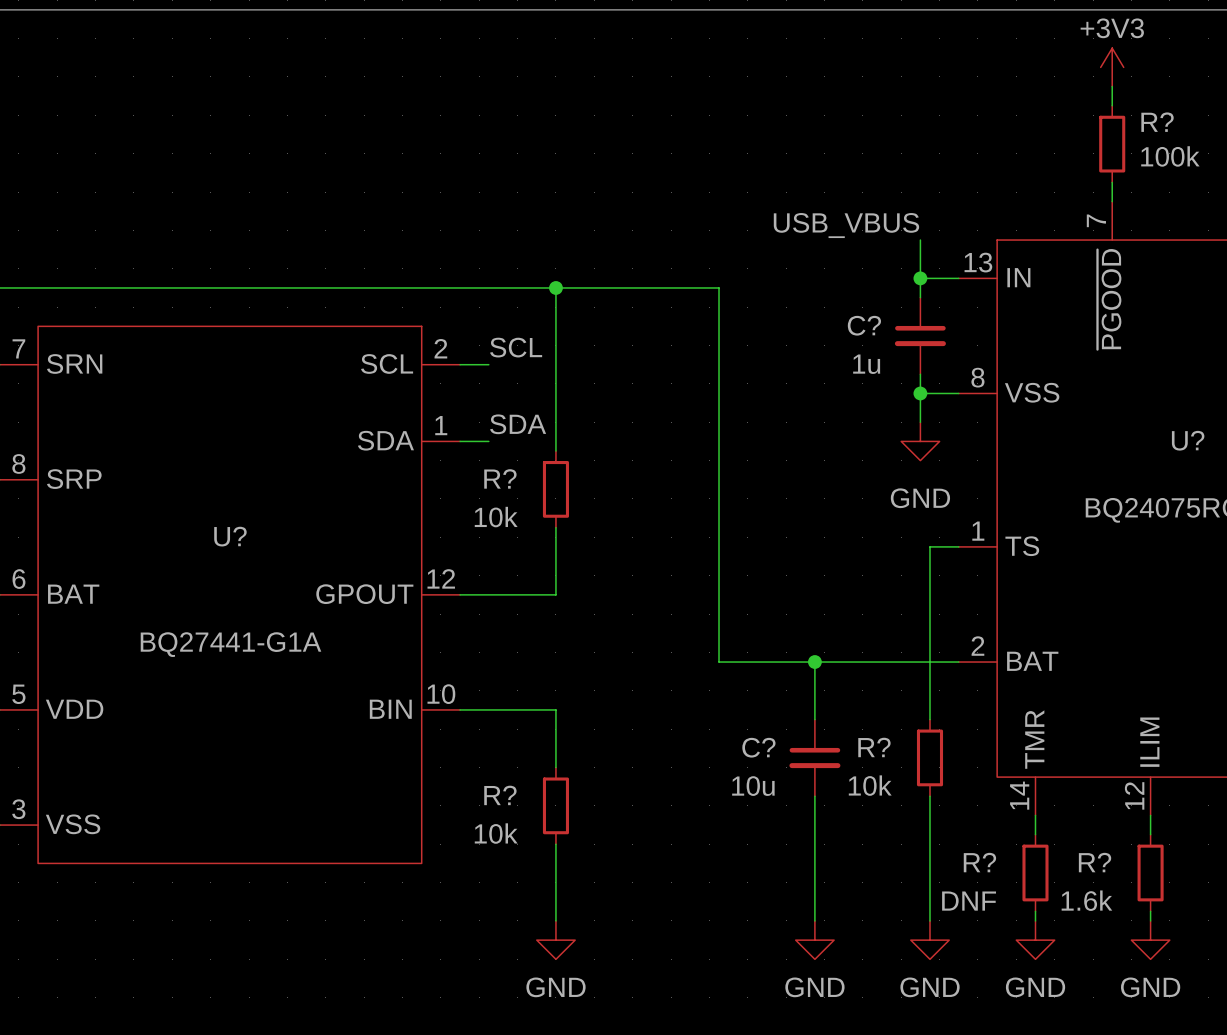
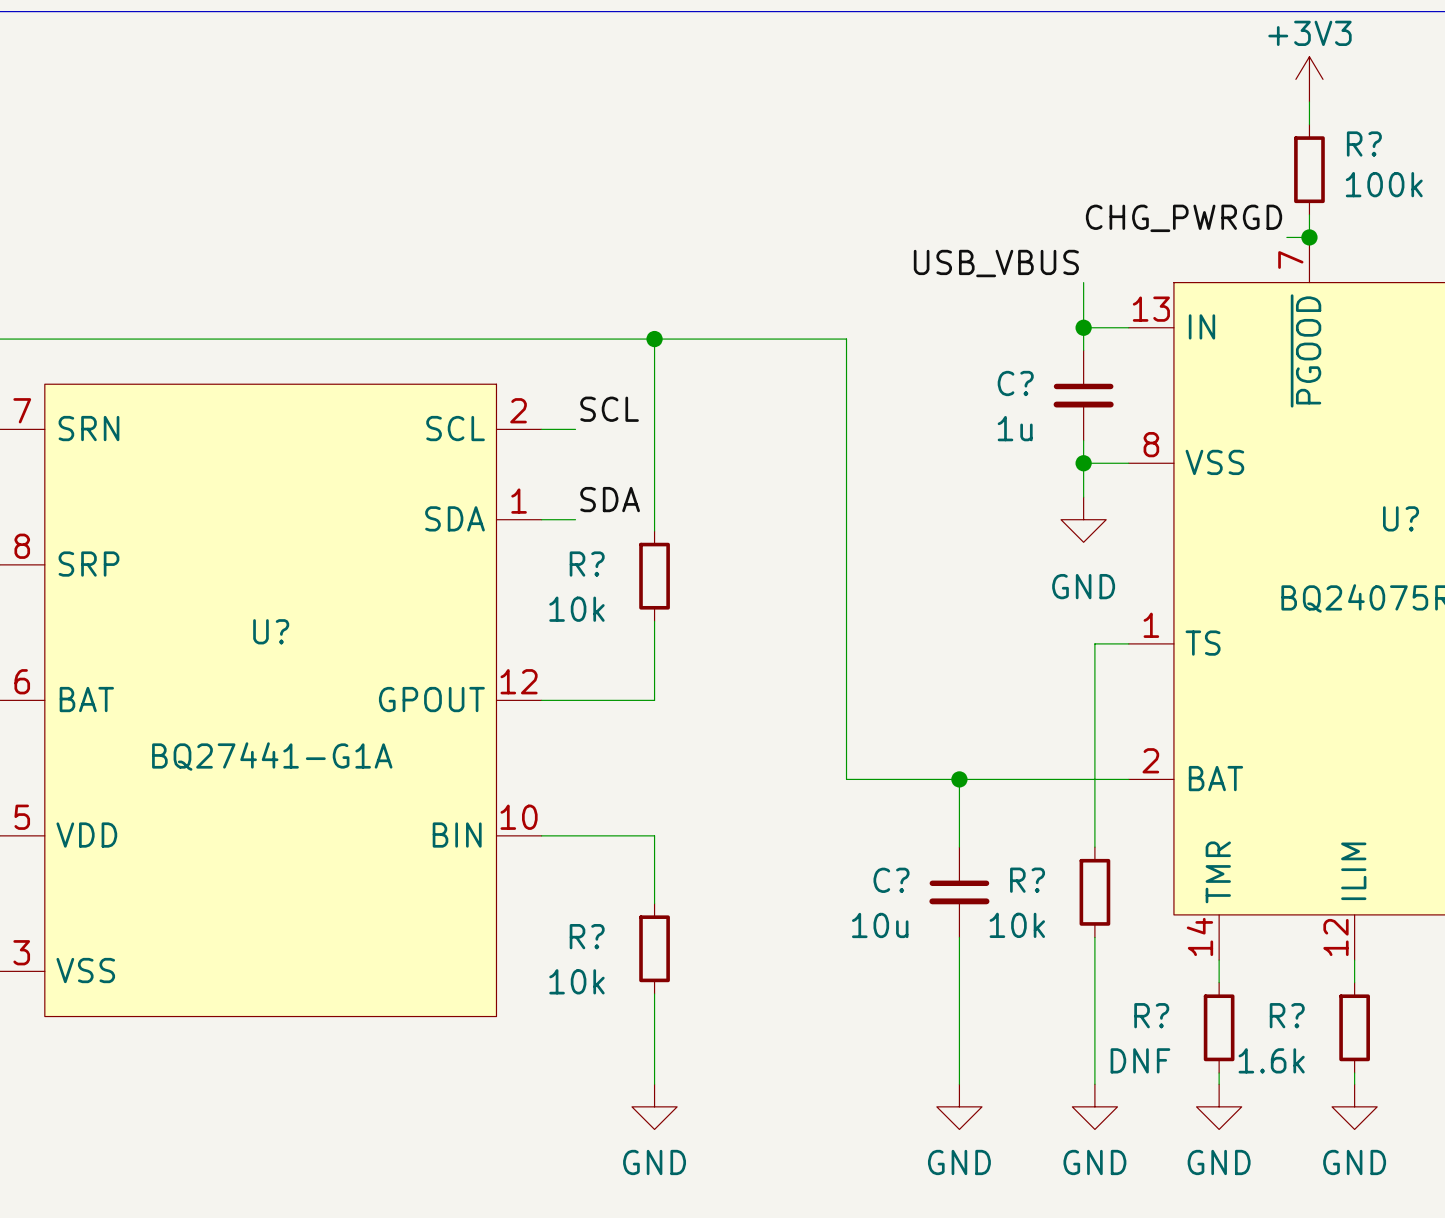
label: none -> CHG_PWRGD (1184, 218)
wire: none -> (1286, 237) (1309, 237)
junction: none -> (1309, 237)

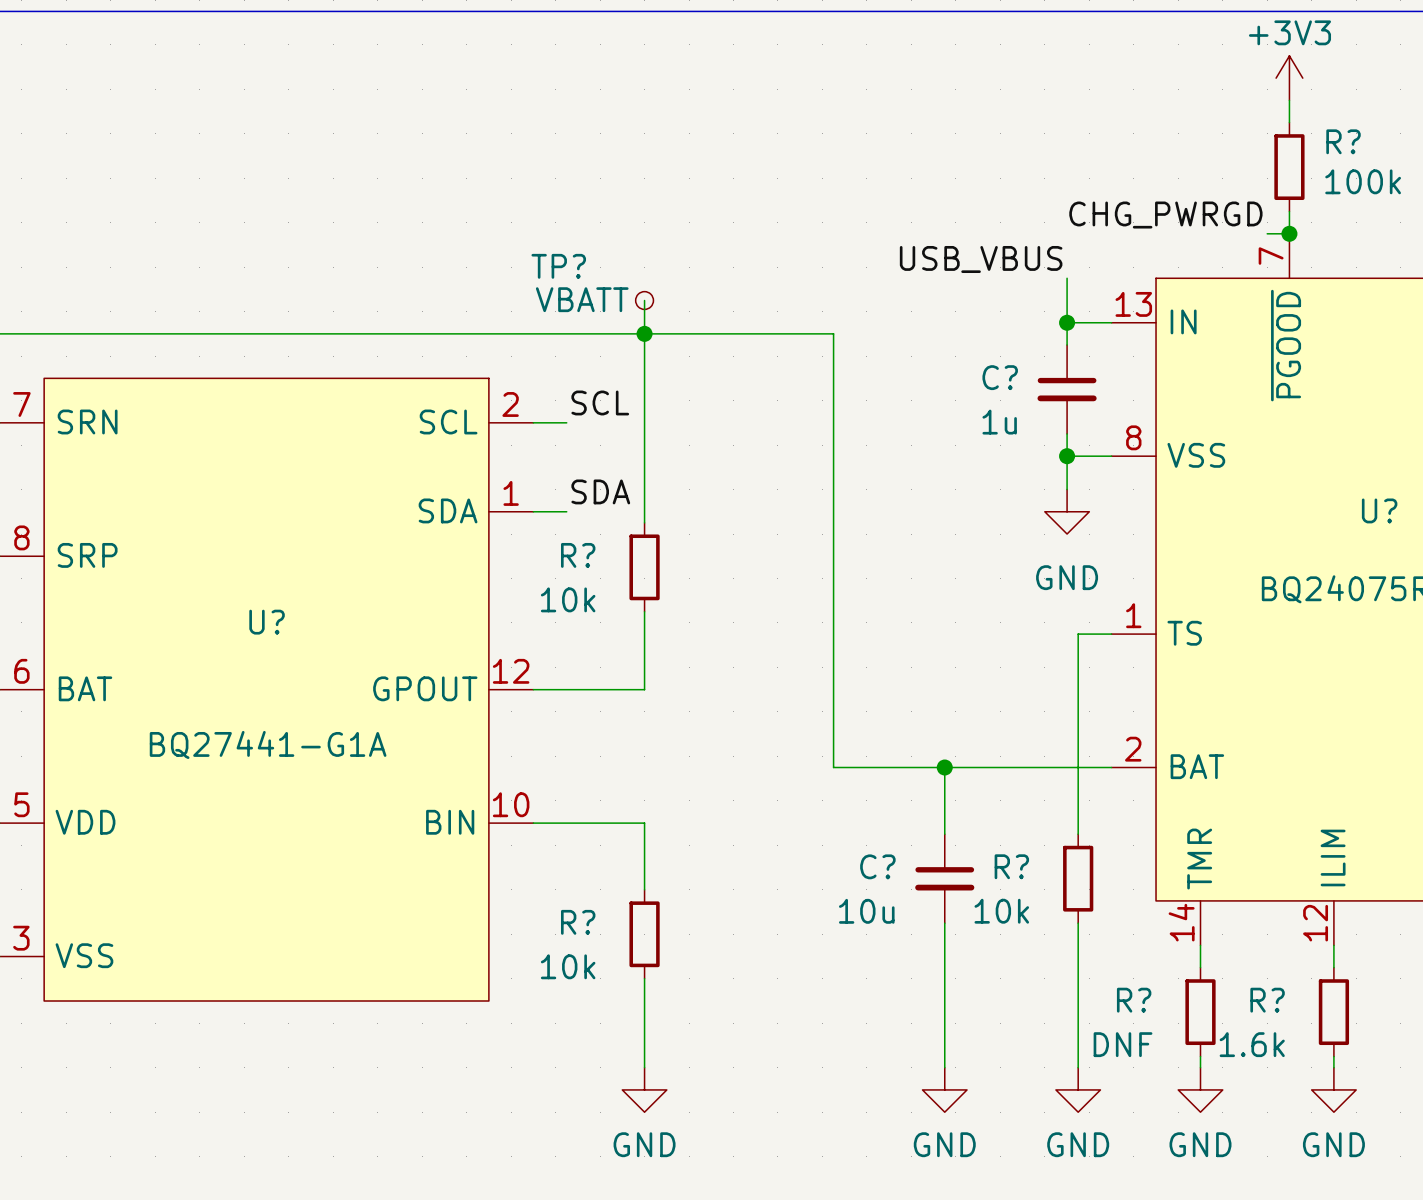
wire: none -> (644, 300) (644, 333)
TP?: none -> VBATT (644, 300)

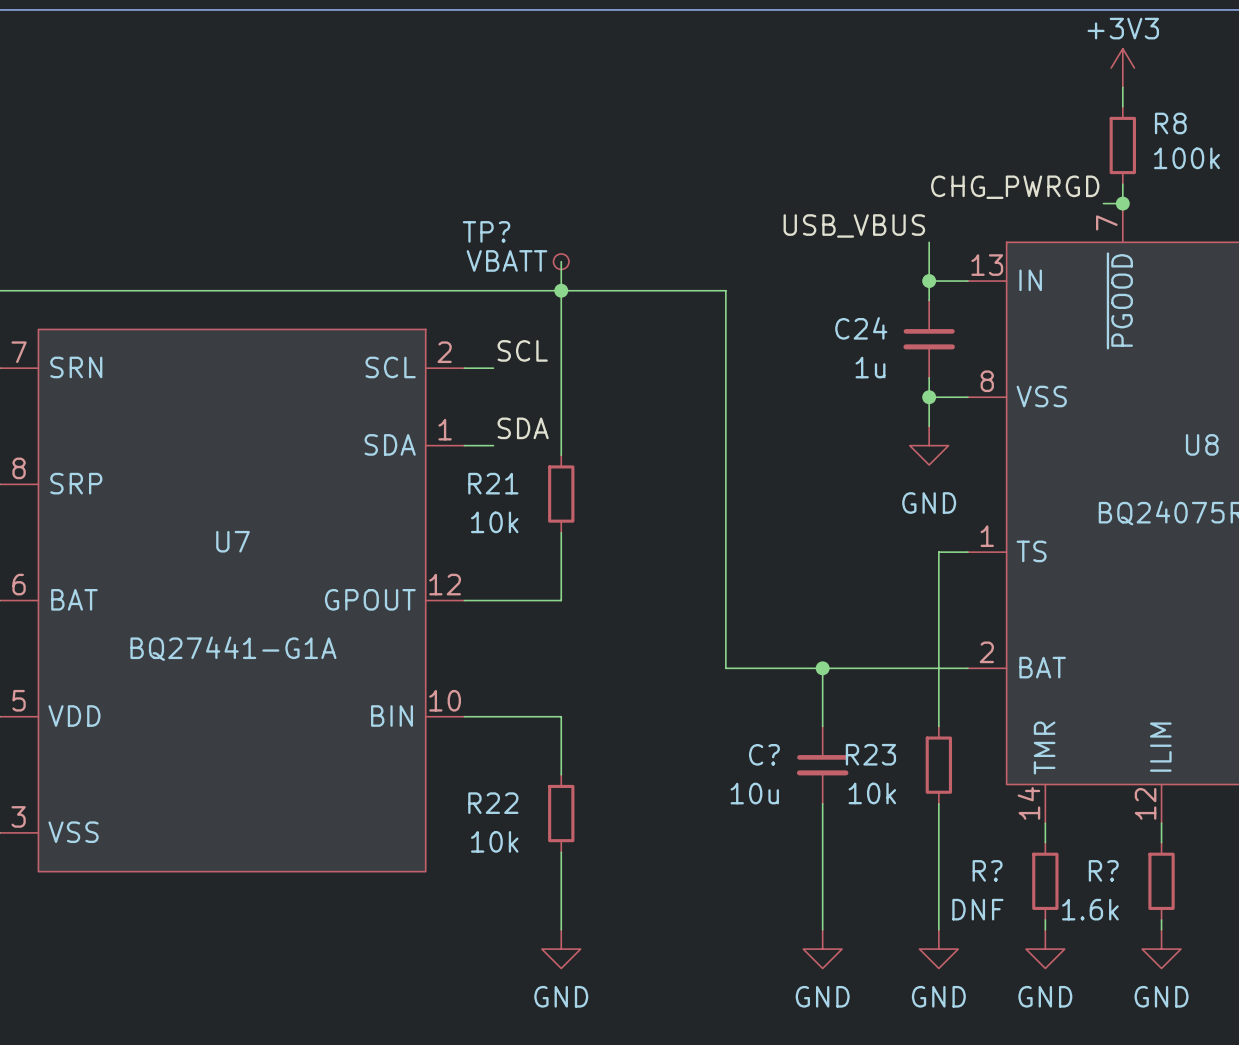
R? name: R? (1343, 141) -> R8 (1170, 123)
C? name: C? (1000, 377) -> C24 (861, 328)
U? name: U? (1379, 510) -> U8 (1202, 444)
R? name: R? (578, 555) -> R21 (493, 483)
U? name: U? (267, 622) -> U7 (232, 541)
R? name: R? (1011, 866) -> R23 (870, 754)
R? name: R? (578, 922) -> R22 (493, 803)

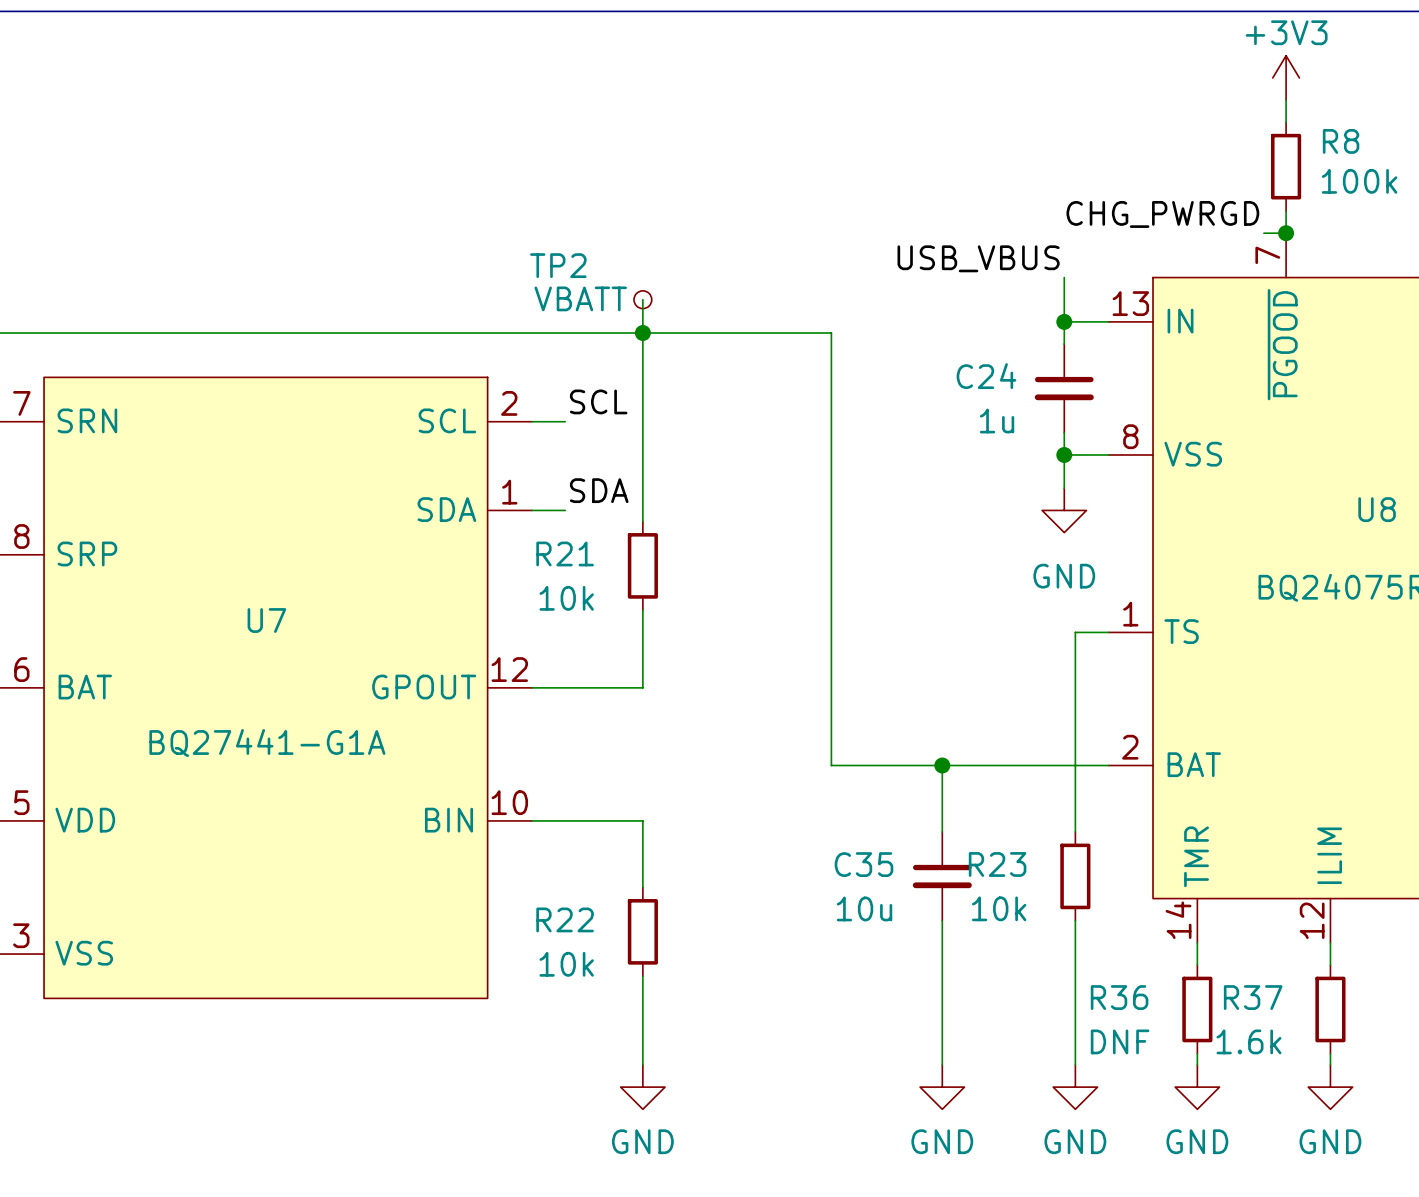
TP? name: TP? (486, 231) -> TP2 (558, 265)
C? name: C? (764, 754) -> C35 (863, 864)
R? name: R? (987, 870) -> R36 (1119, 997)
R? name: R? (1103, 870) -> R37 (1253, 997)

